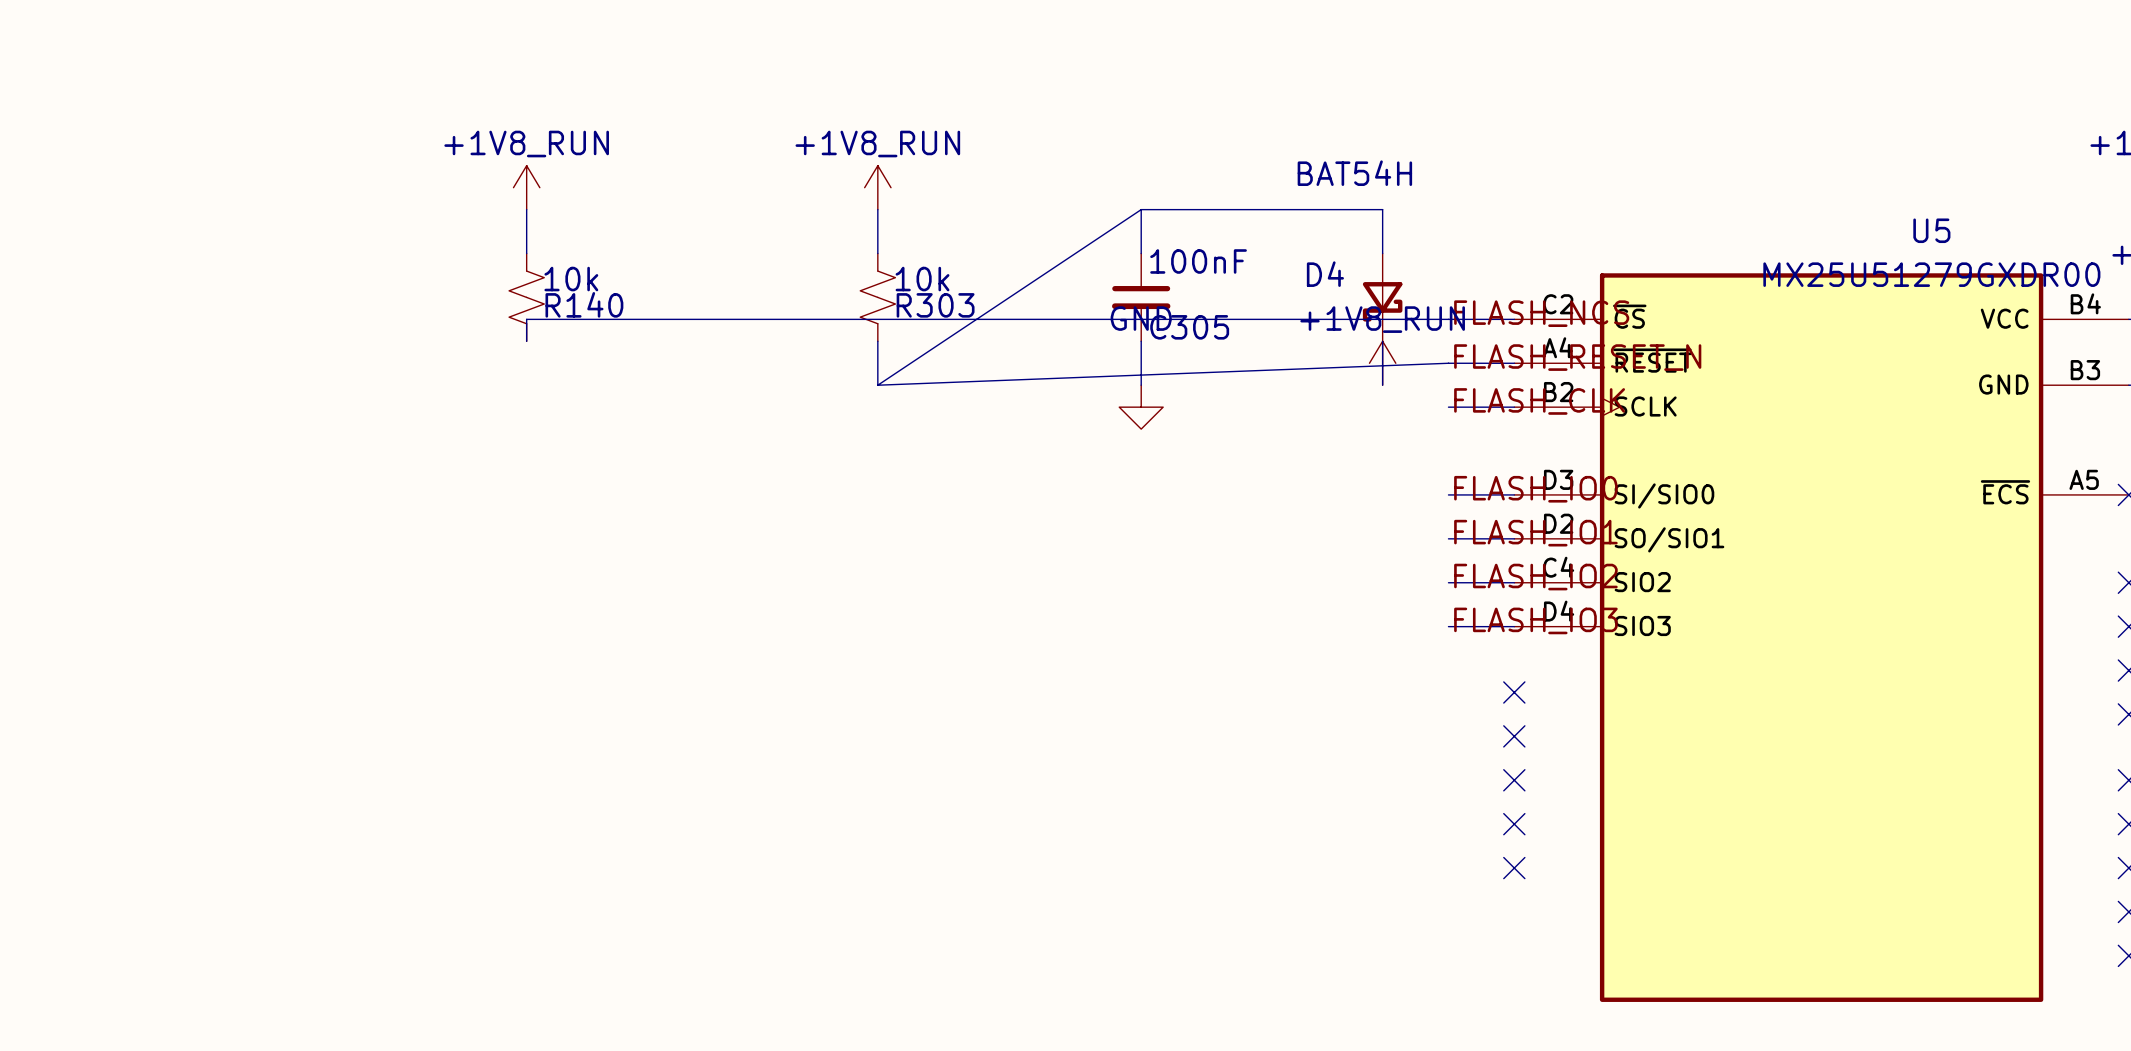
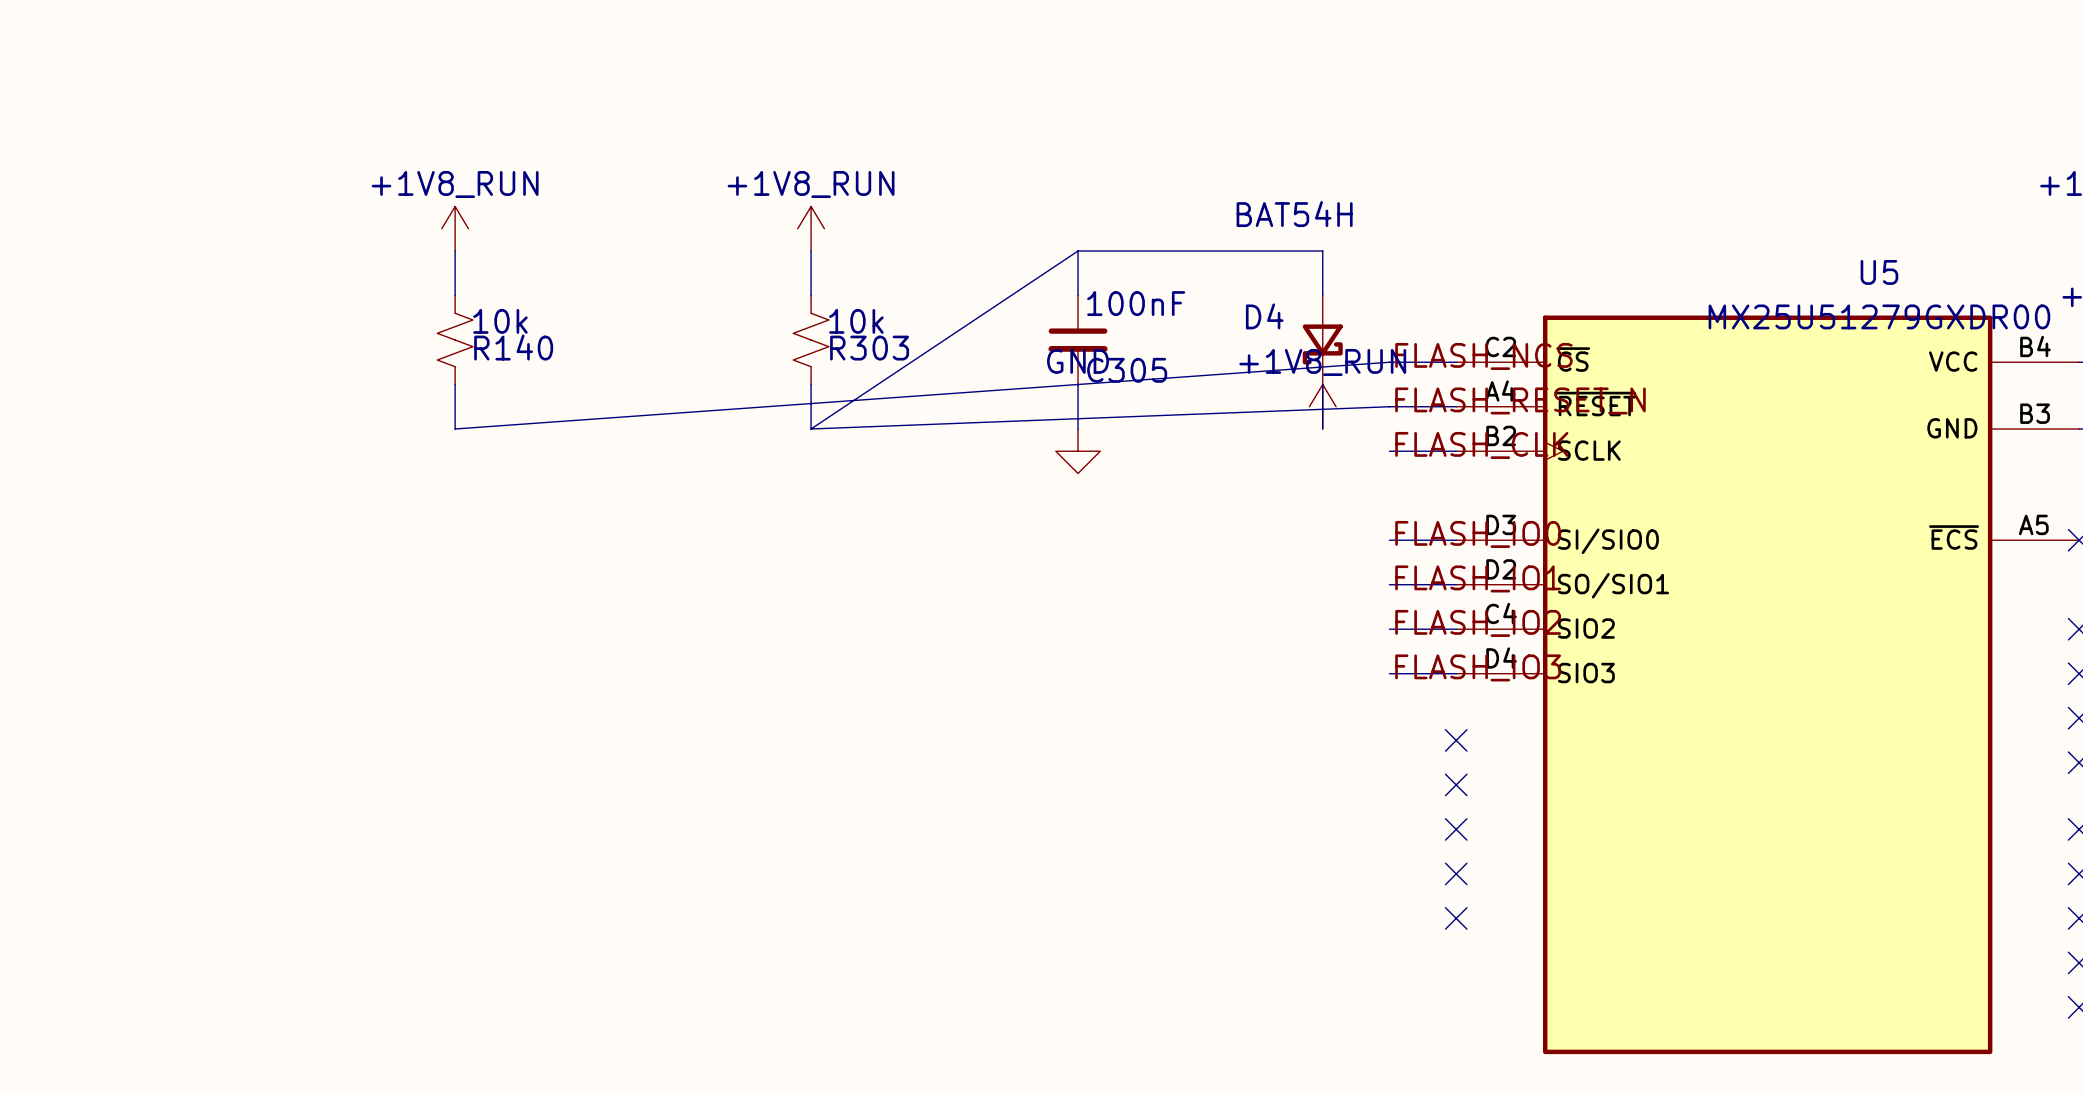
wire: (1448, 319) (526, 319) (526, 341) -> (1389, 362) (455, 428) (455, 384)

